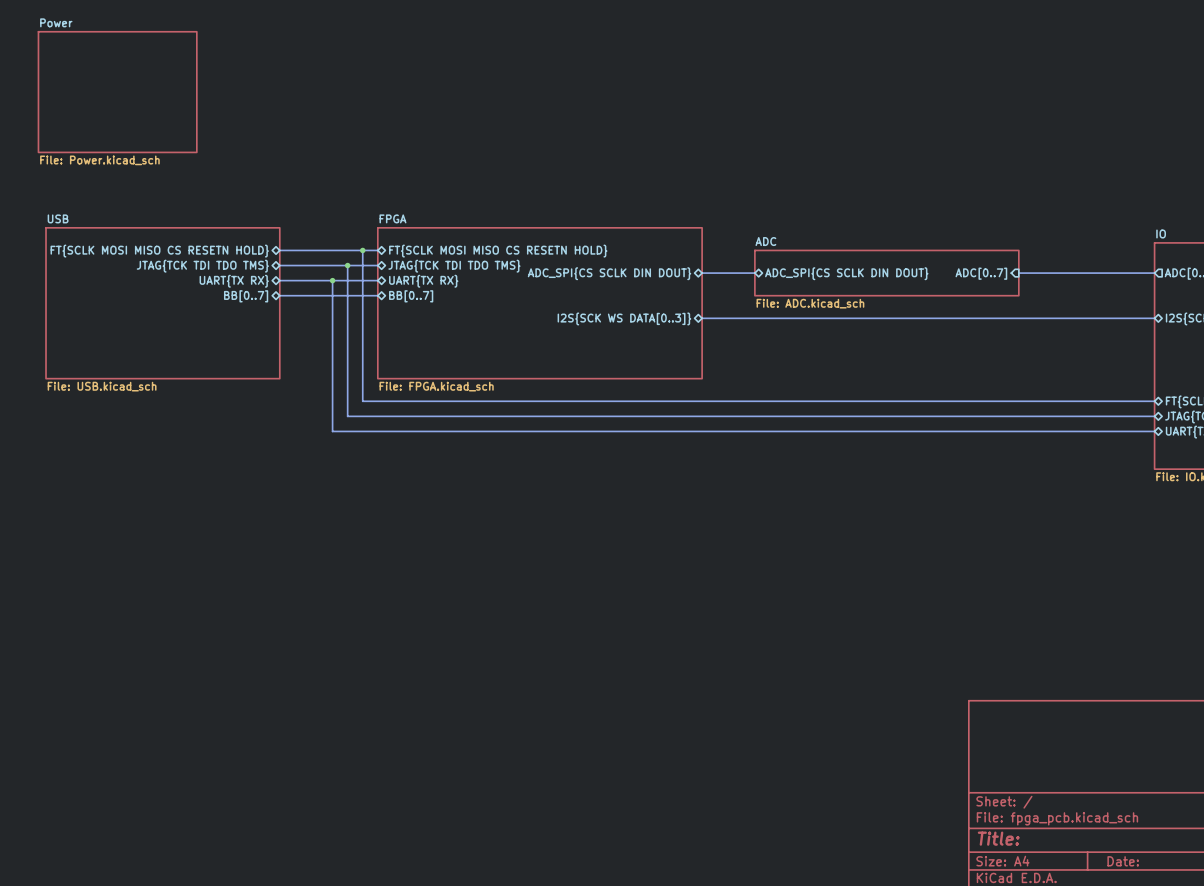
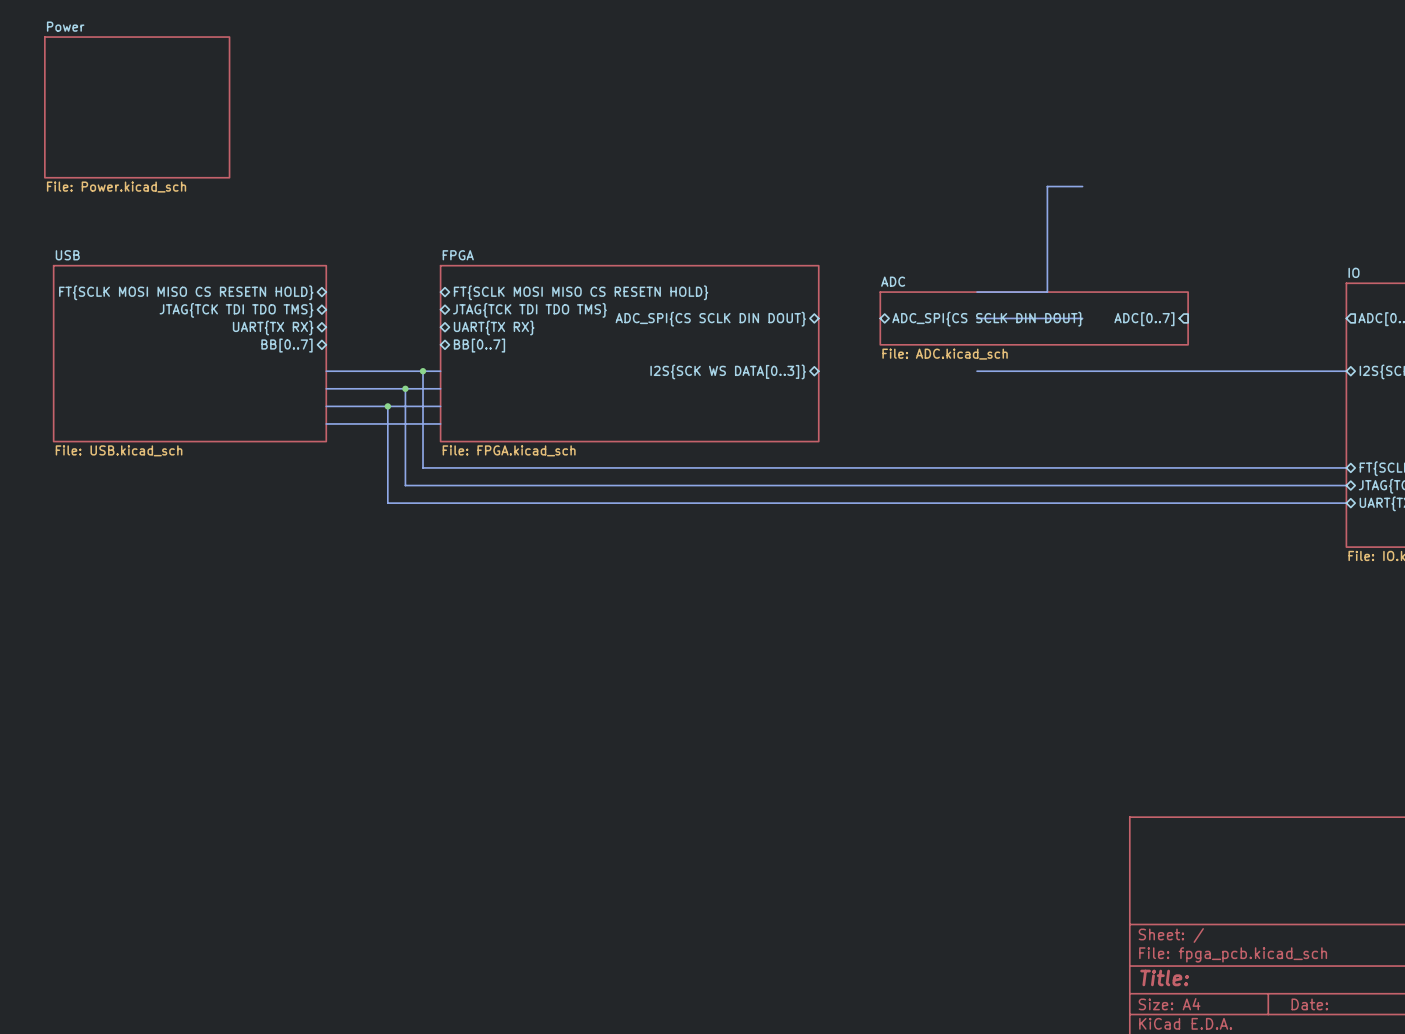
bus: none -> (1082, 186) (1047, 186) (1047, 292) (977, 292)
bus: (279, 250) (377, 250) -> (326, 371) (440, 371)
bus: (362, 250) (362, 318) -> none
junction: (362, 250) -> none
bus: (279, 265) (377, 265) -> (326, 388) (440, 388)
bus: (347, 265) (347, 333) -> none
junction: (347, 265) -> none
bus: (702, 273) (754, 273) -> none
bus: none -> (977, 318) (1082, 318)
bus: (1018, 273) (1154, 273) -> none
bus: (279, 280) (377, 280) -> (326, 406) (440, 406)
bus: (332, 280) (332, 348) -> none
junction: (332, 280) -> none
bus: (279, 295) (377, 295) -> (326, 423) (440, 423)
junction: none -> (423, 371)
bus: (702, 318) (837, 318) -> none
junction: none -> (405, 388)
junction: none -> (387, 406)

